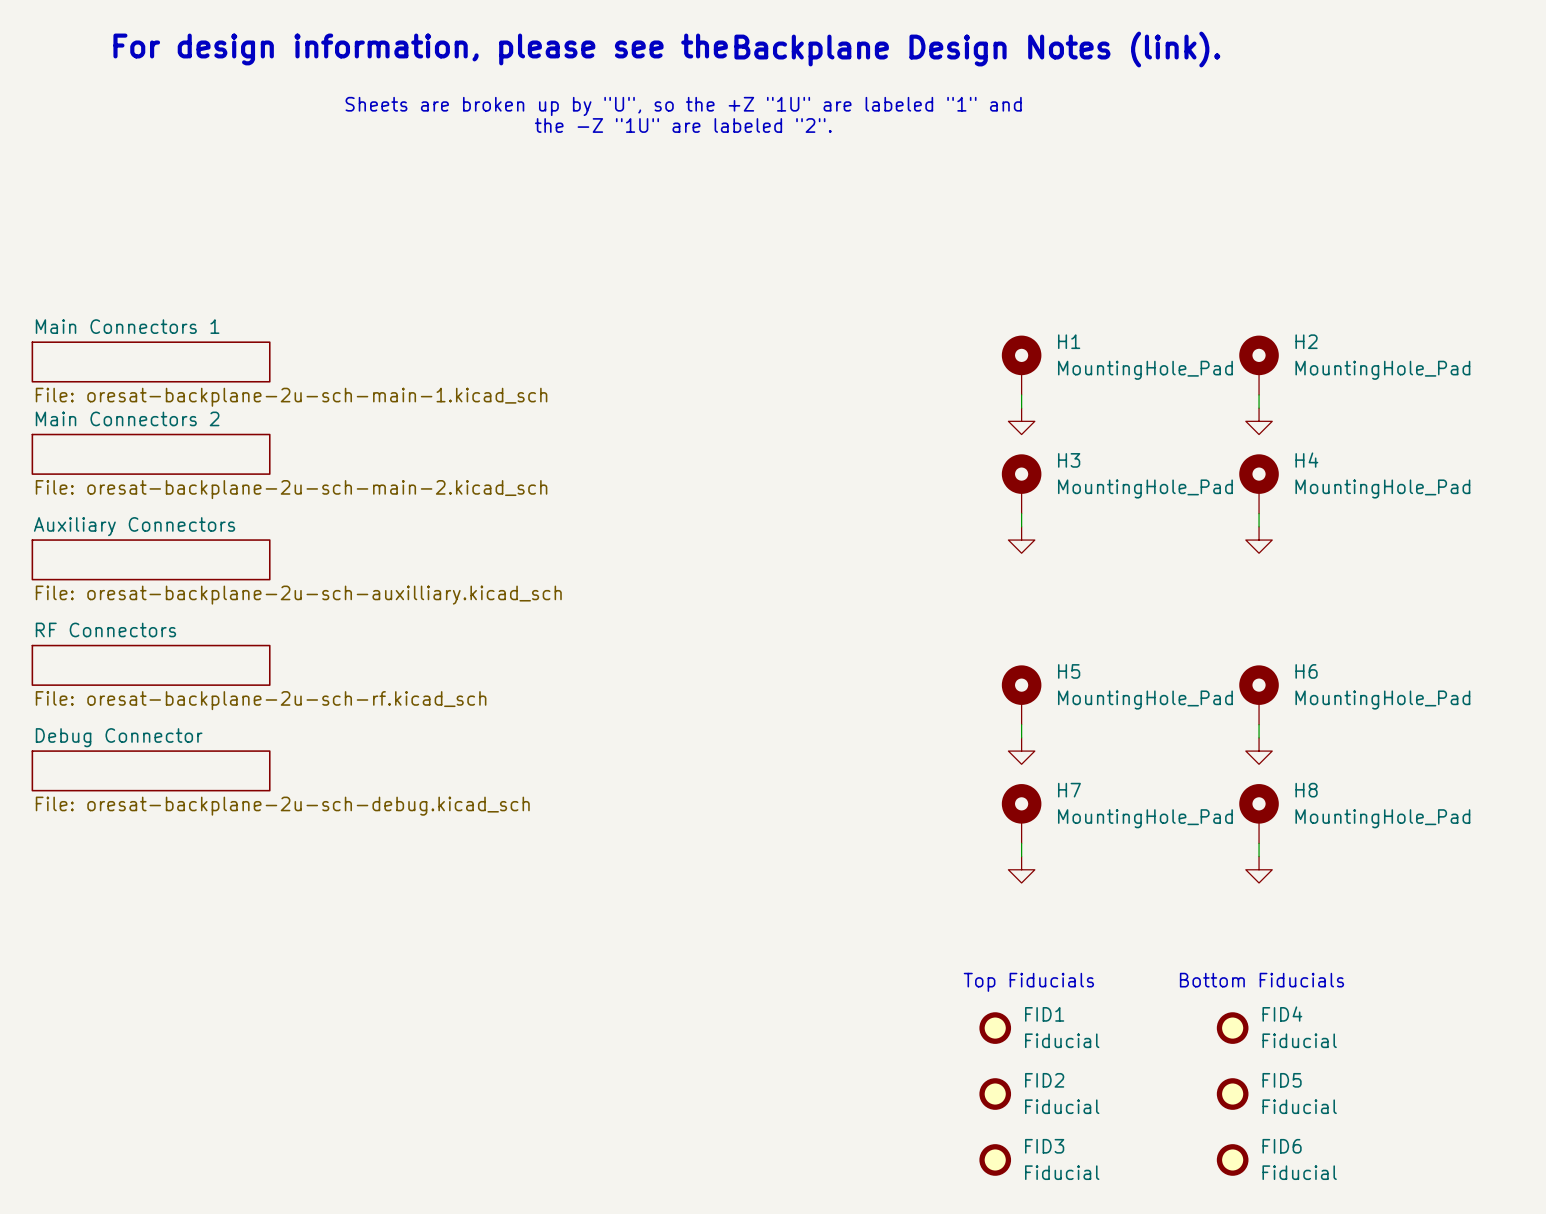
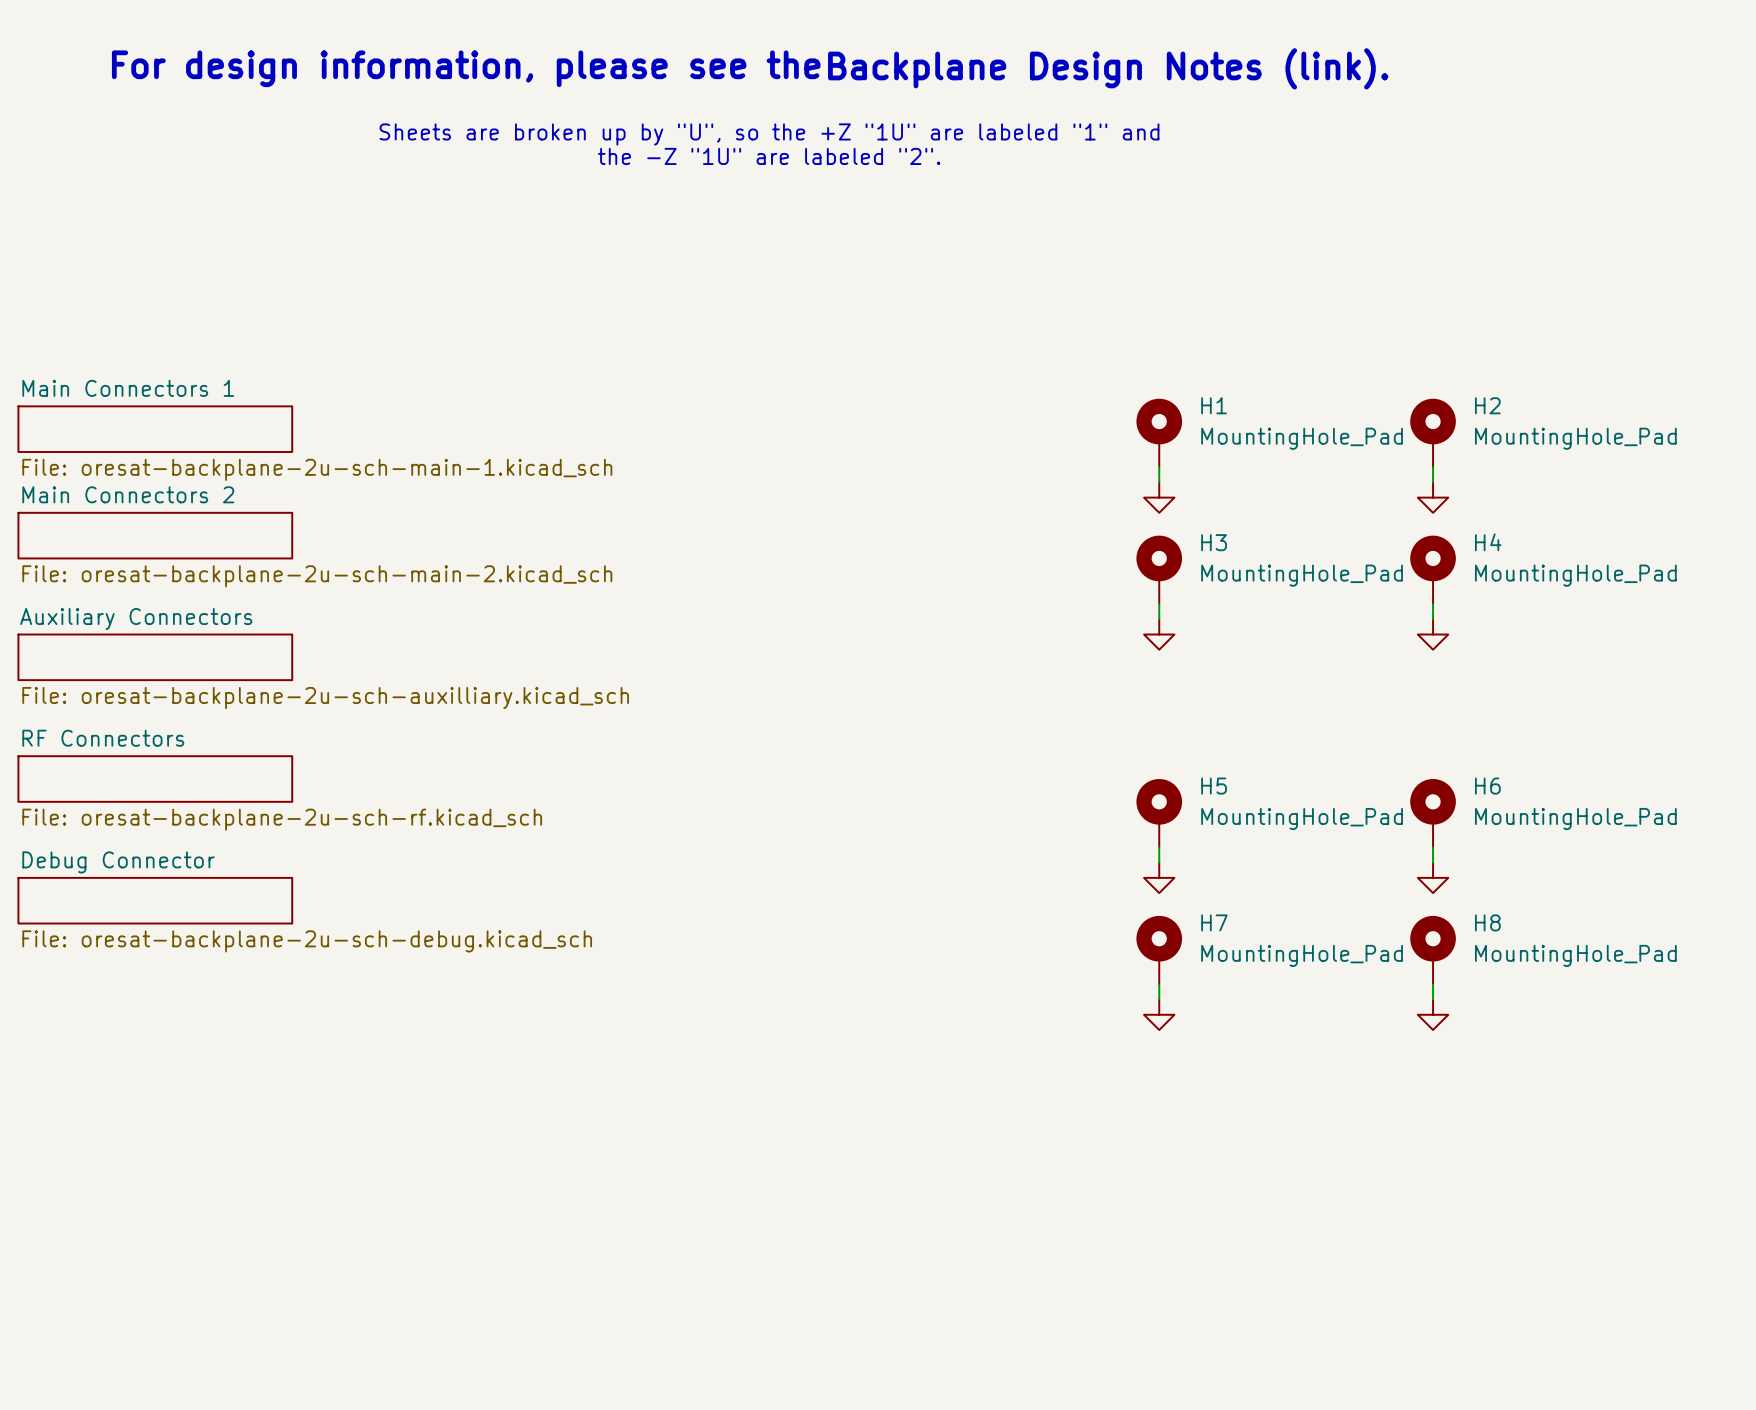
text: Bottom Fiducials (1261, 980) -> none
text: Top Fiducials (1028, 982) -> none
FID1: Fiducial (995, 1028) -> none
FID4: Fiducial (1232, 1028) -> none
FID2: Fiducial (995, 1094) -> none
FID5: Fiducial (1232, 1094) -> none
FID3: Fiducial (995, 1159) -> none
FID6: Fiducial (1232, 1159) -> none

